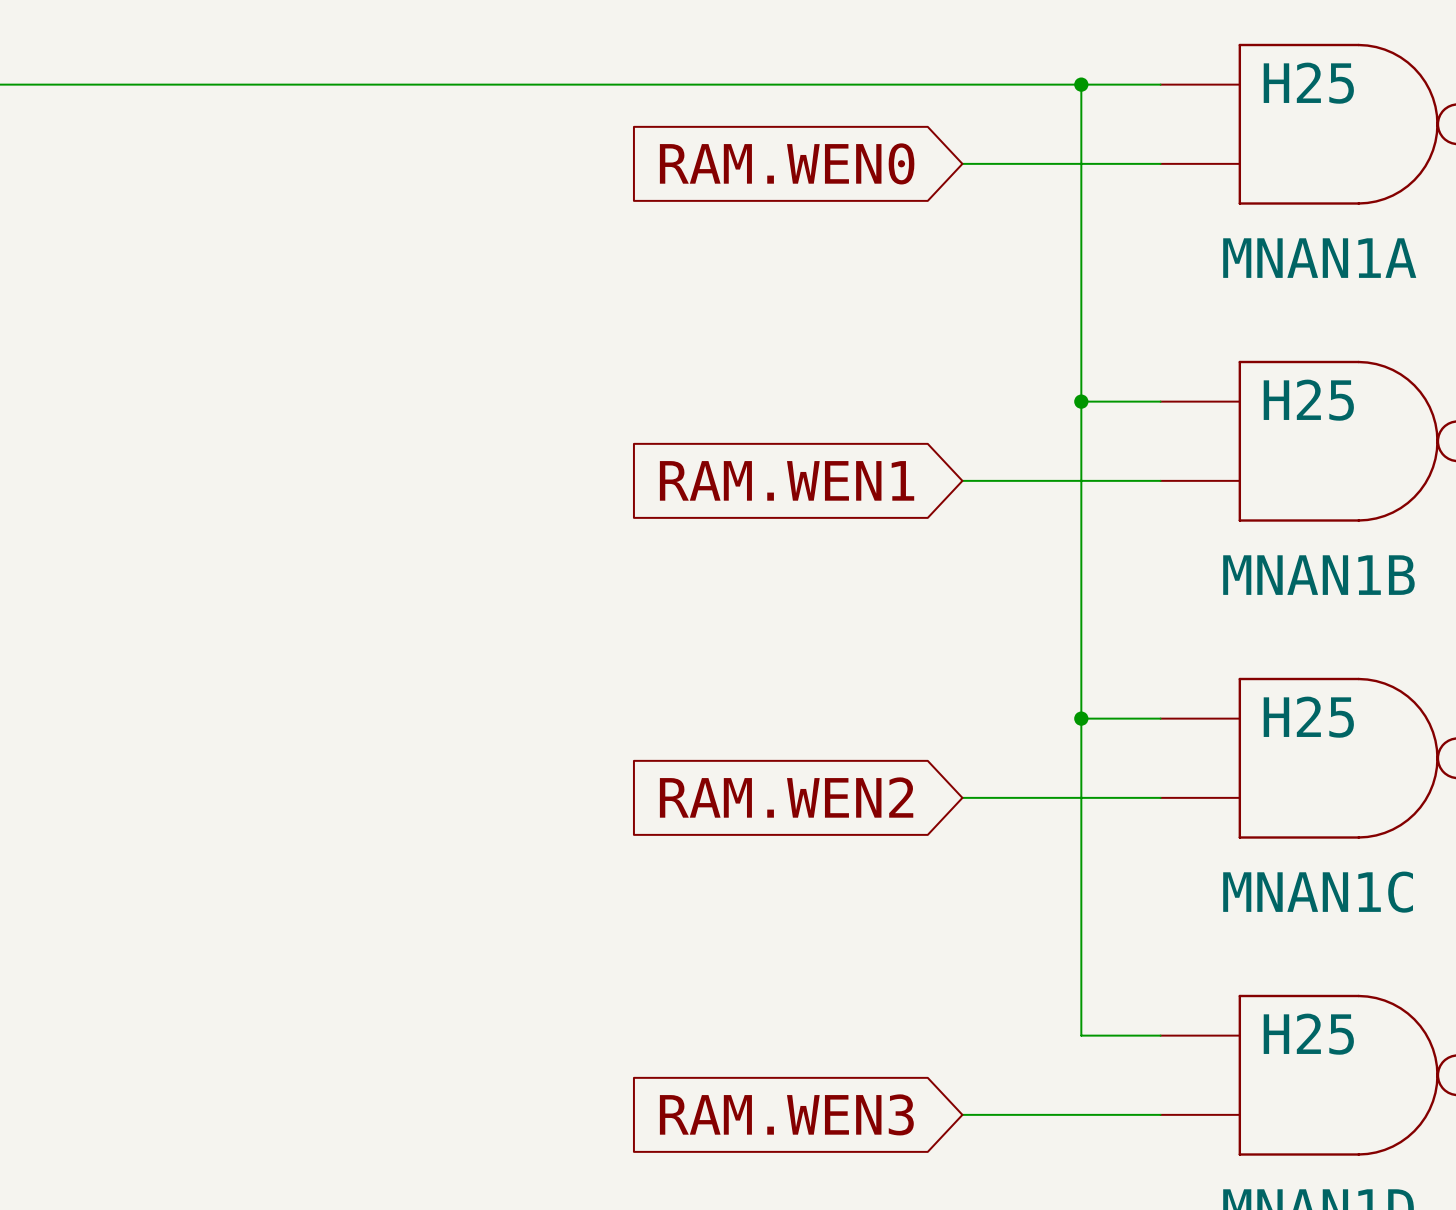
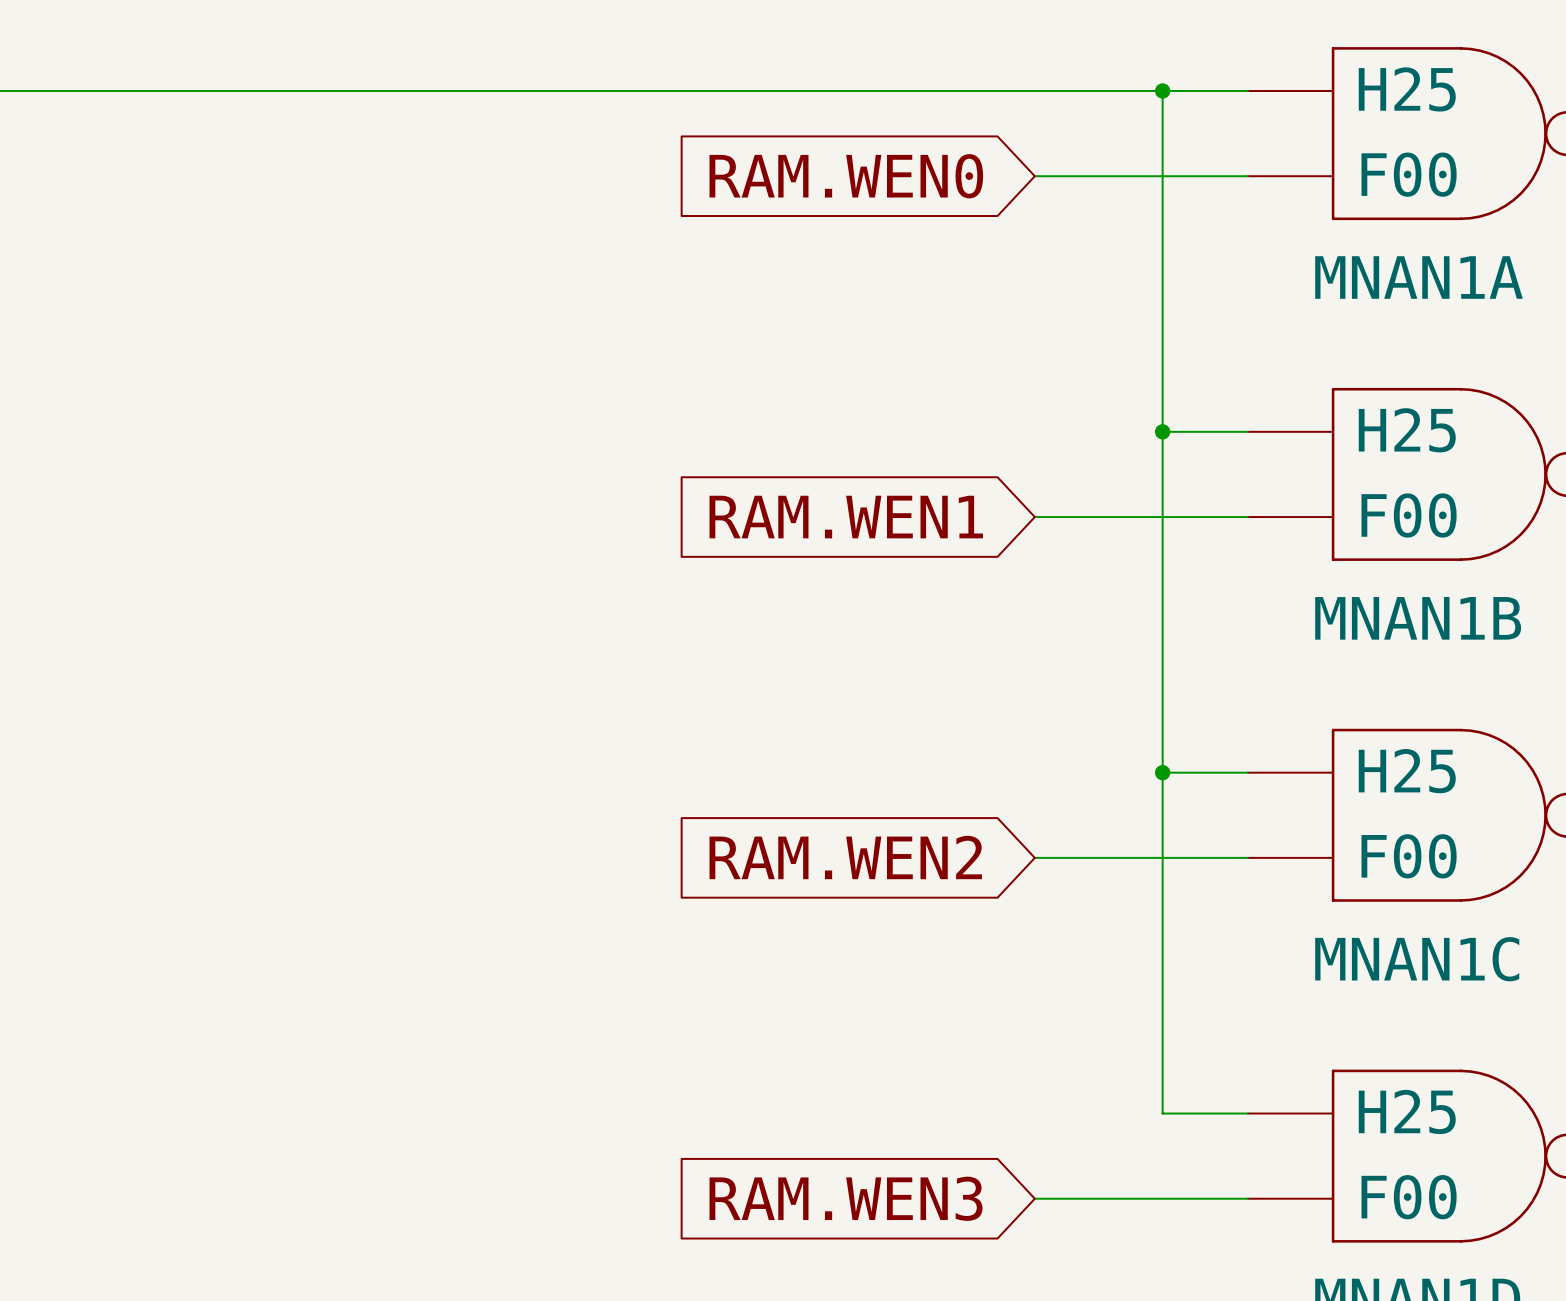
part value: none -> F00 (1409, 174)
part value: none -> F00 (1409, 515)
part value: none -> F00 (1409, 856)
part value: none -> F00 (1409, 1197)

